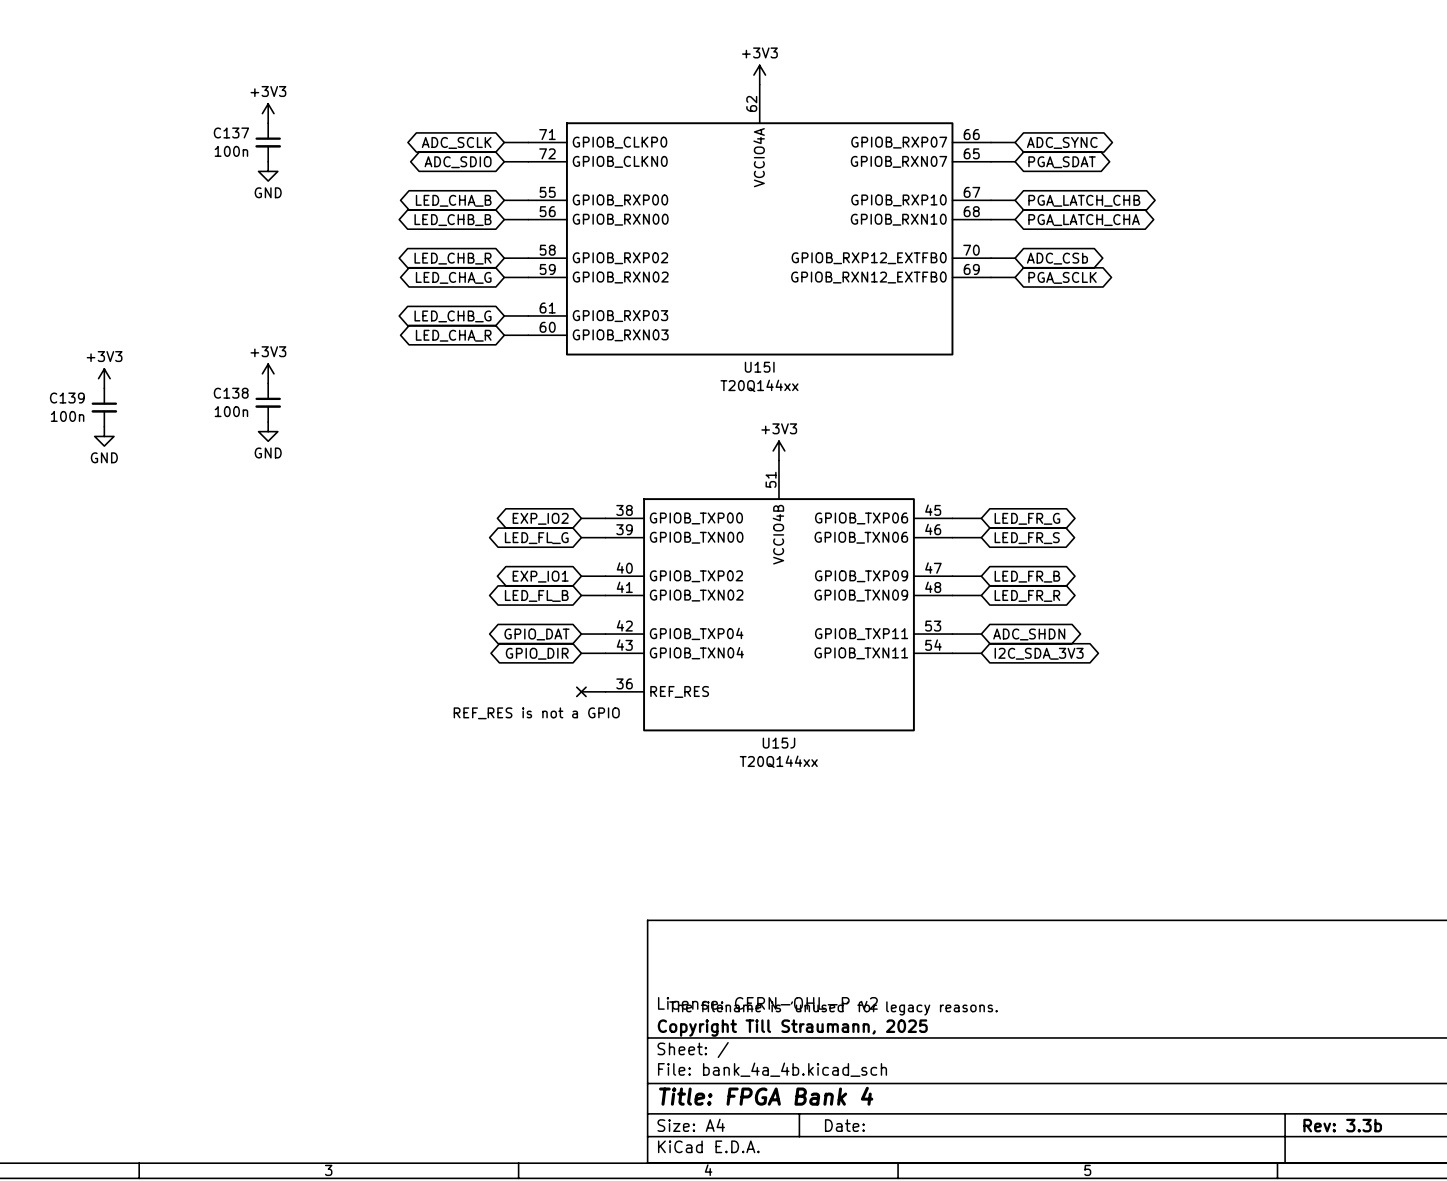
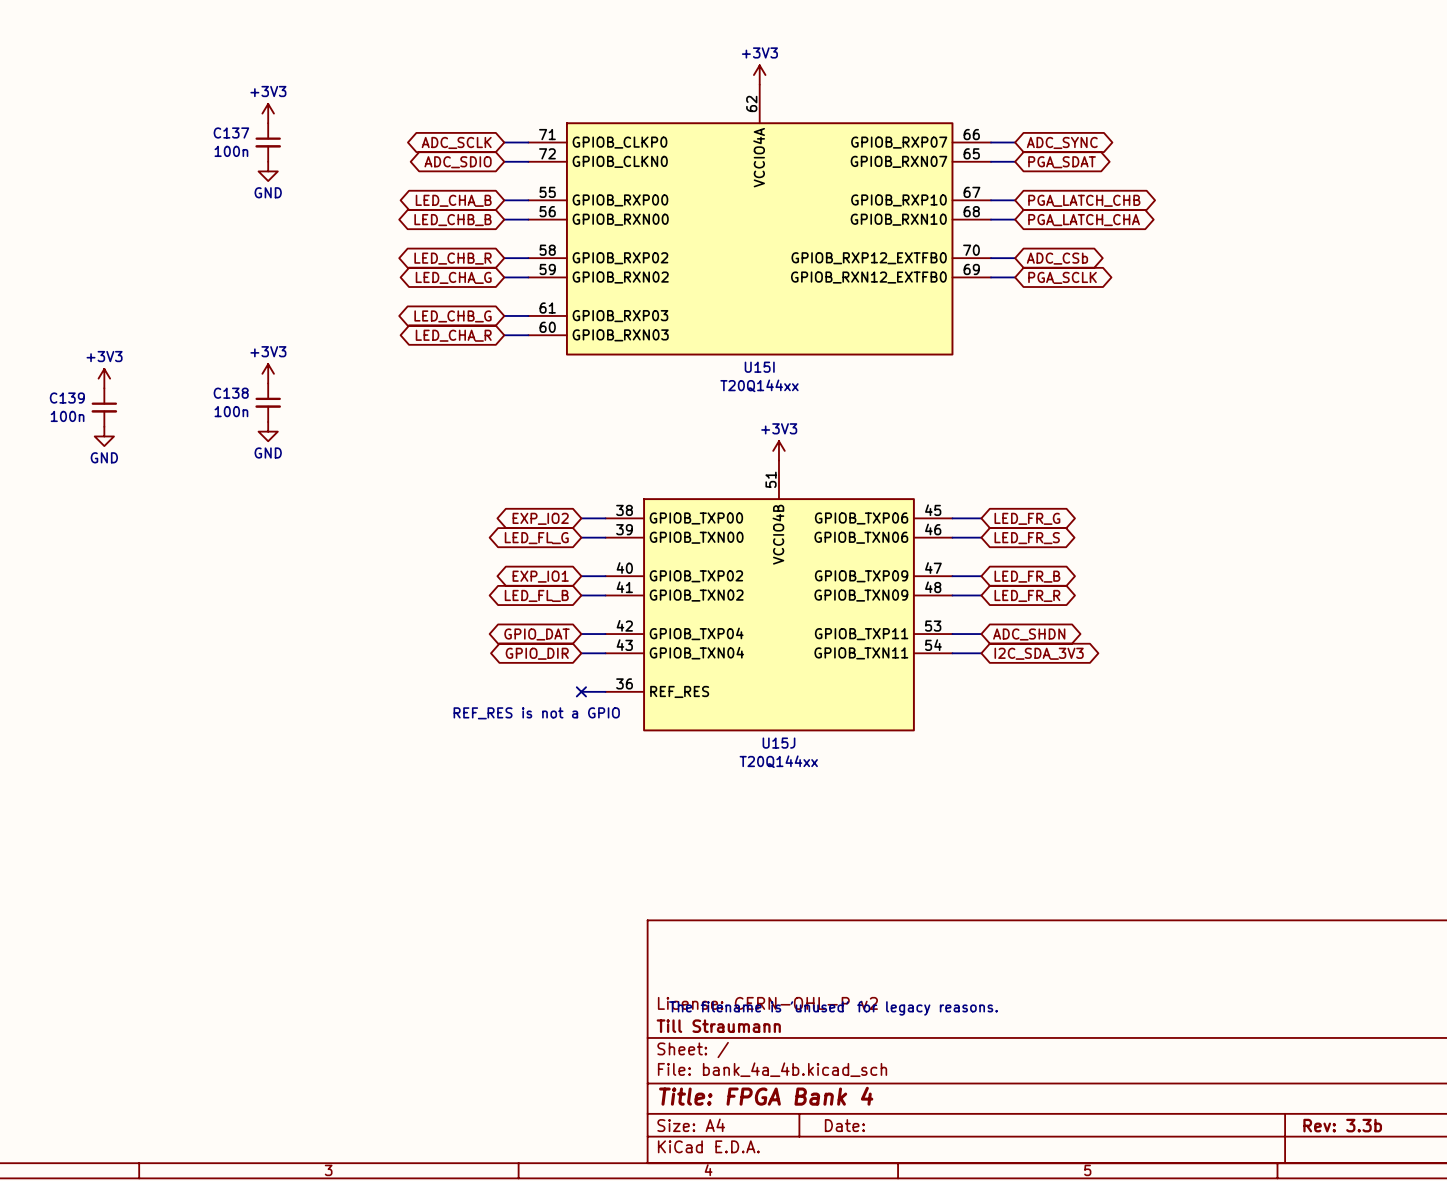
title block: Copyright Till Straumann, 2025 (792, 1028) -> Till Straumann (718, 1026)

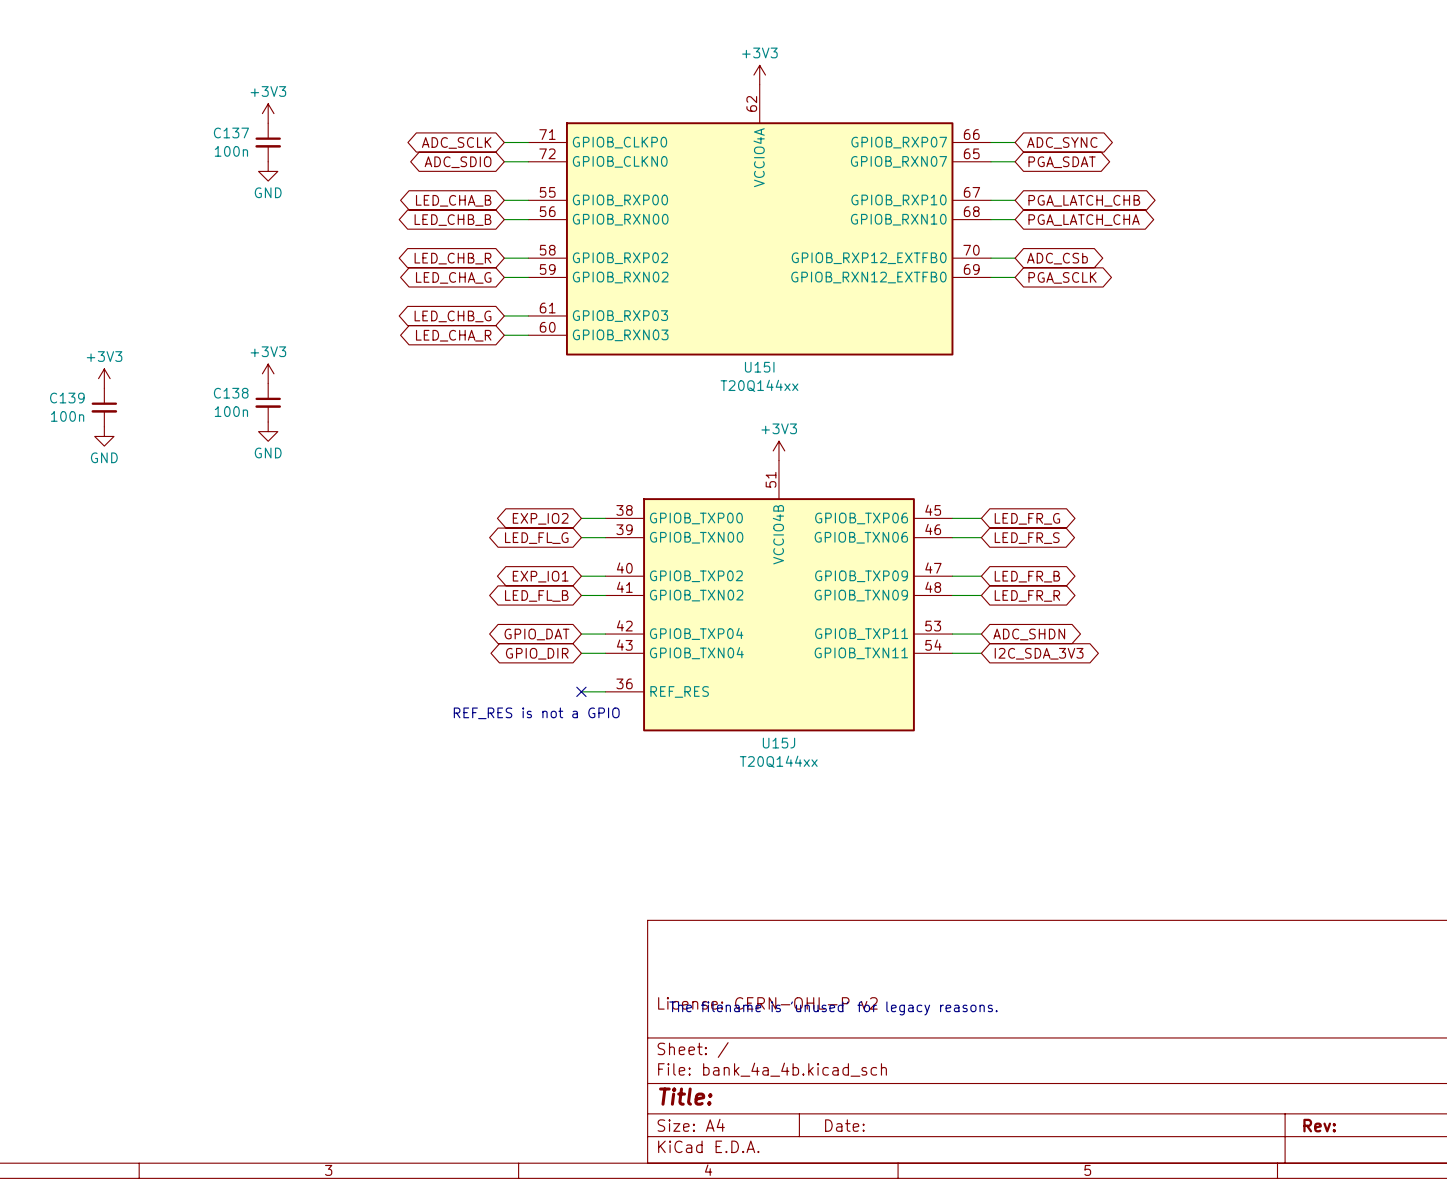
title block: Till Straumann (718, 1026) -> none
title block: Title: FPGA Bank 4 (766, 1096) -> Title: (685, 1096)
title block: Rev: 3.3b (1342, 1125) -> Rev: (1319, 1125)

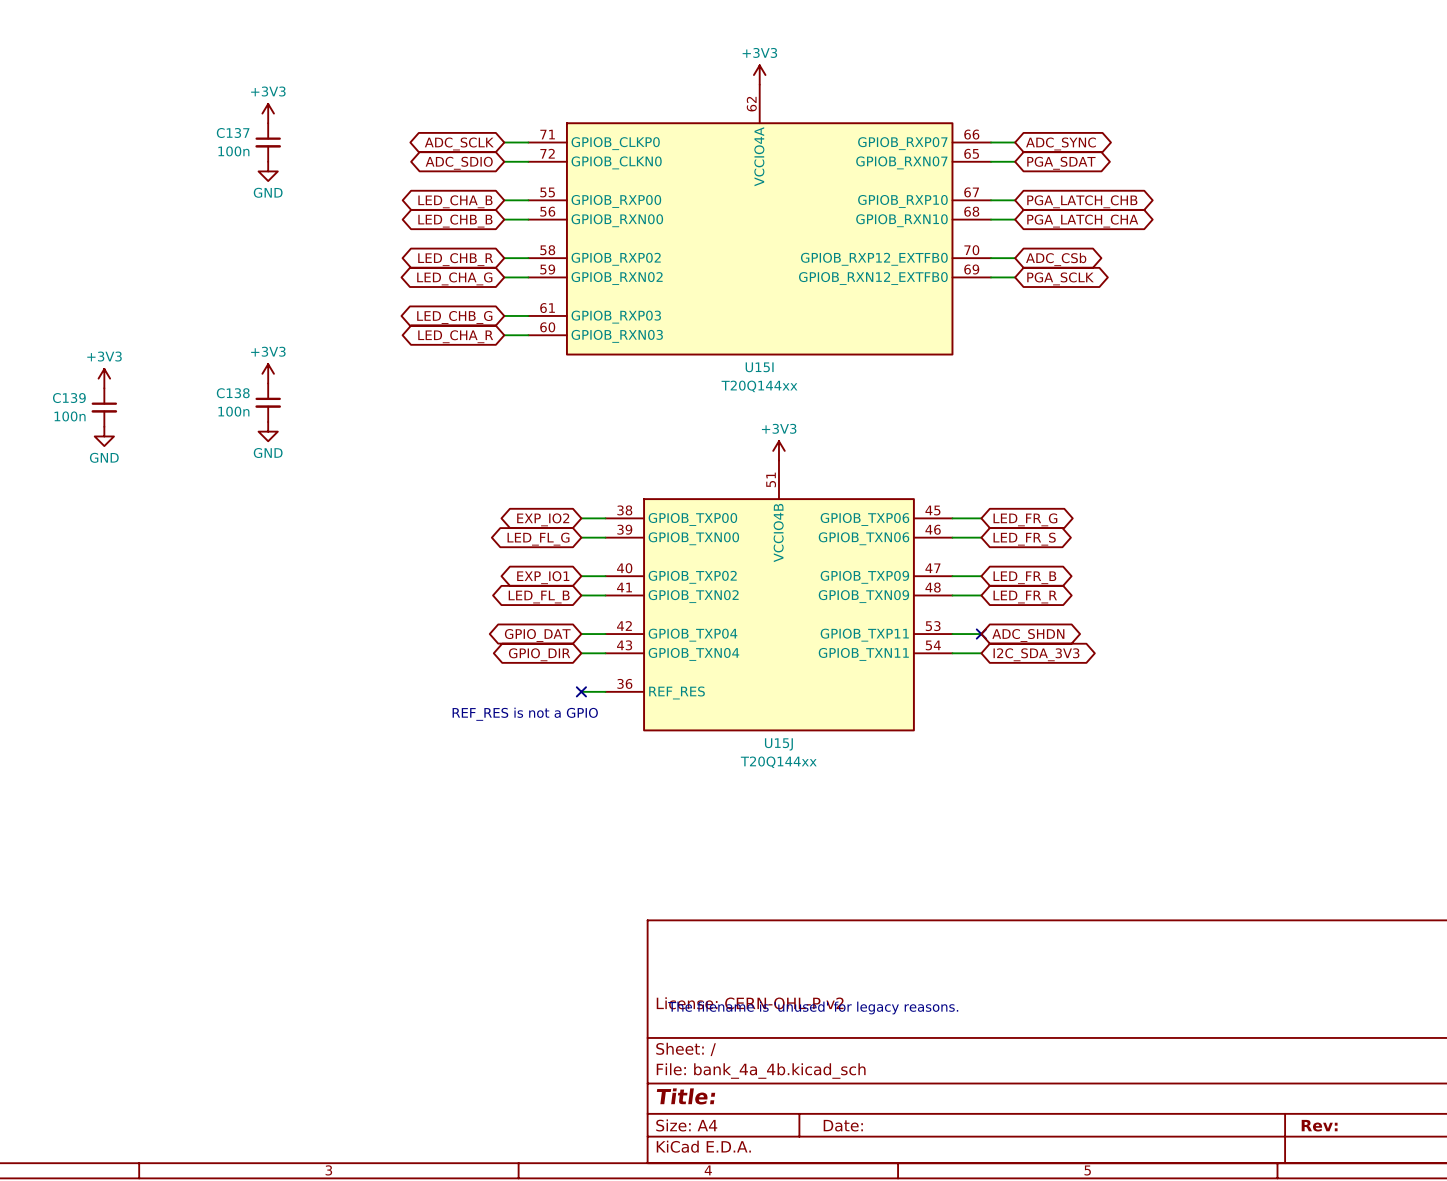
no-connect mark: none -> (981, 634)

